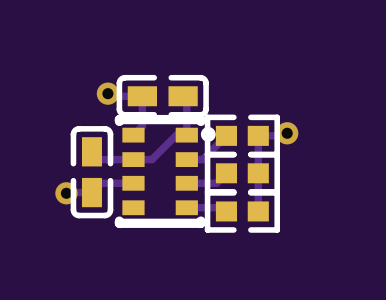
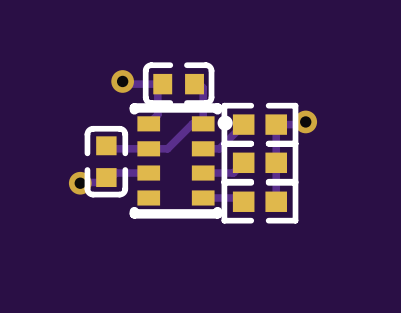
part footprint: [116, 74, 209, 118] -> [142, 62, 215, 106]
part footprint: [70, 126, 114, 219] -> [84, 125, 129, 198]

